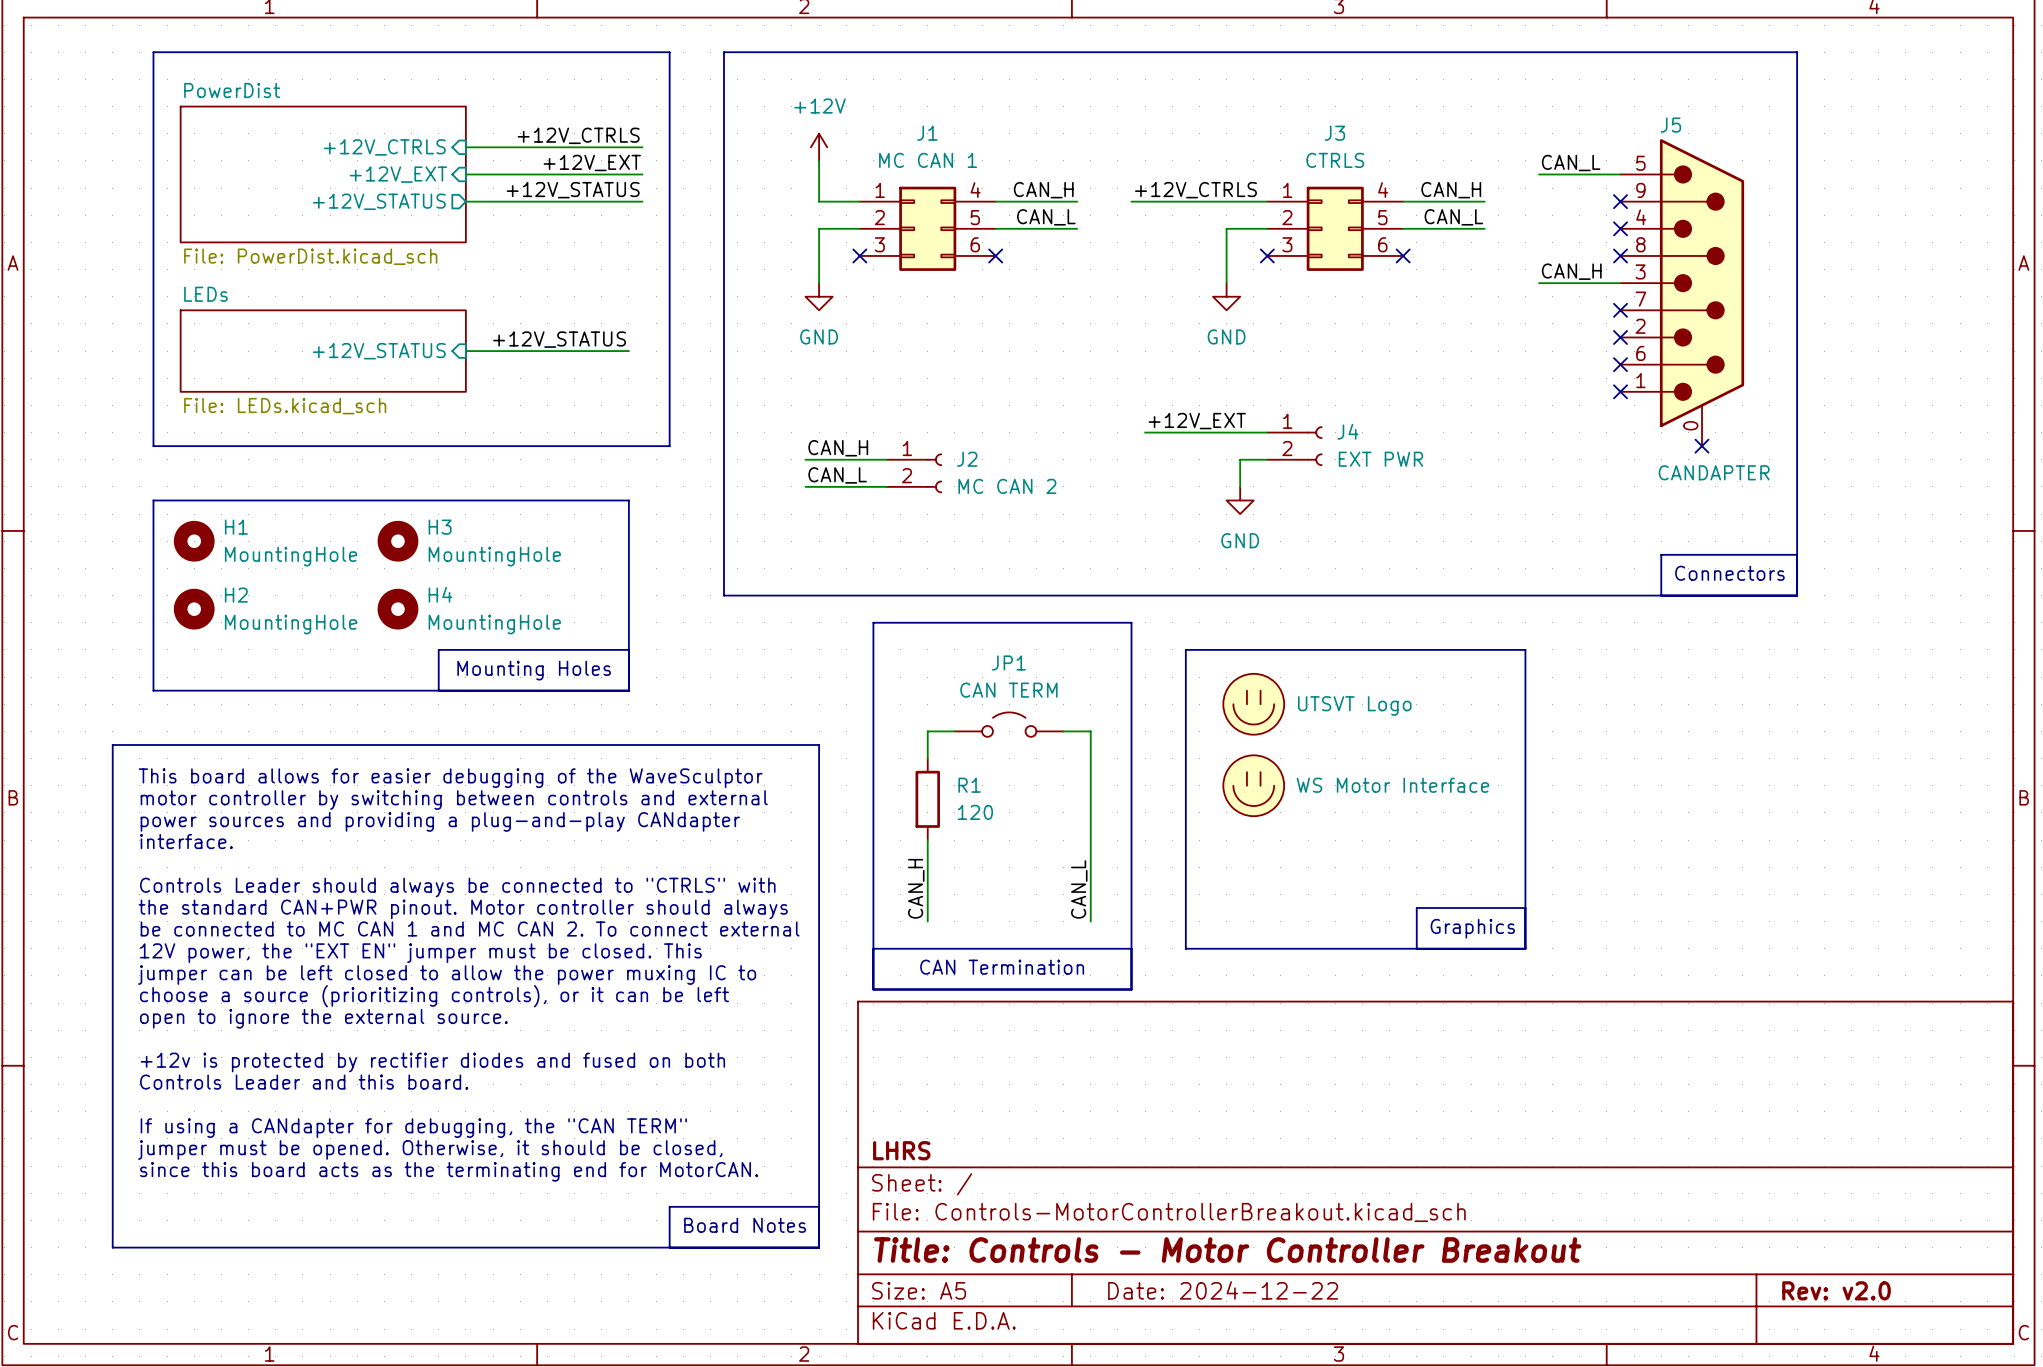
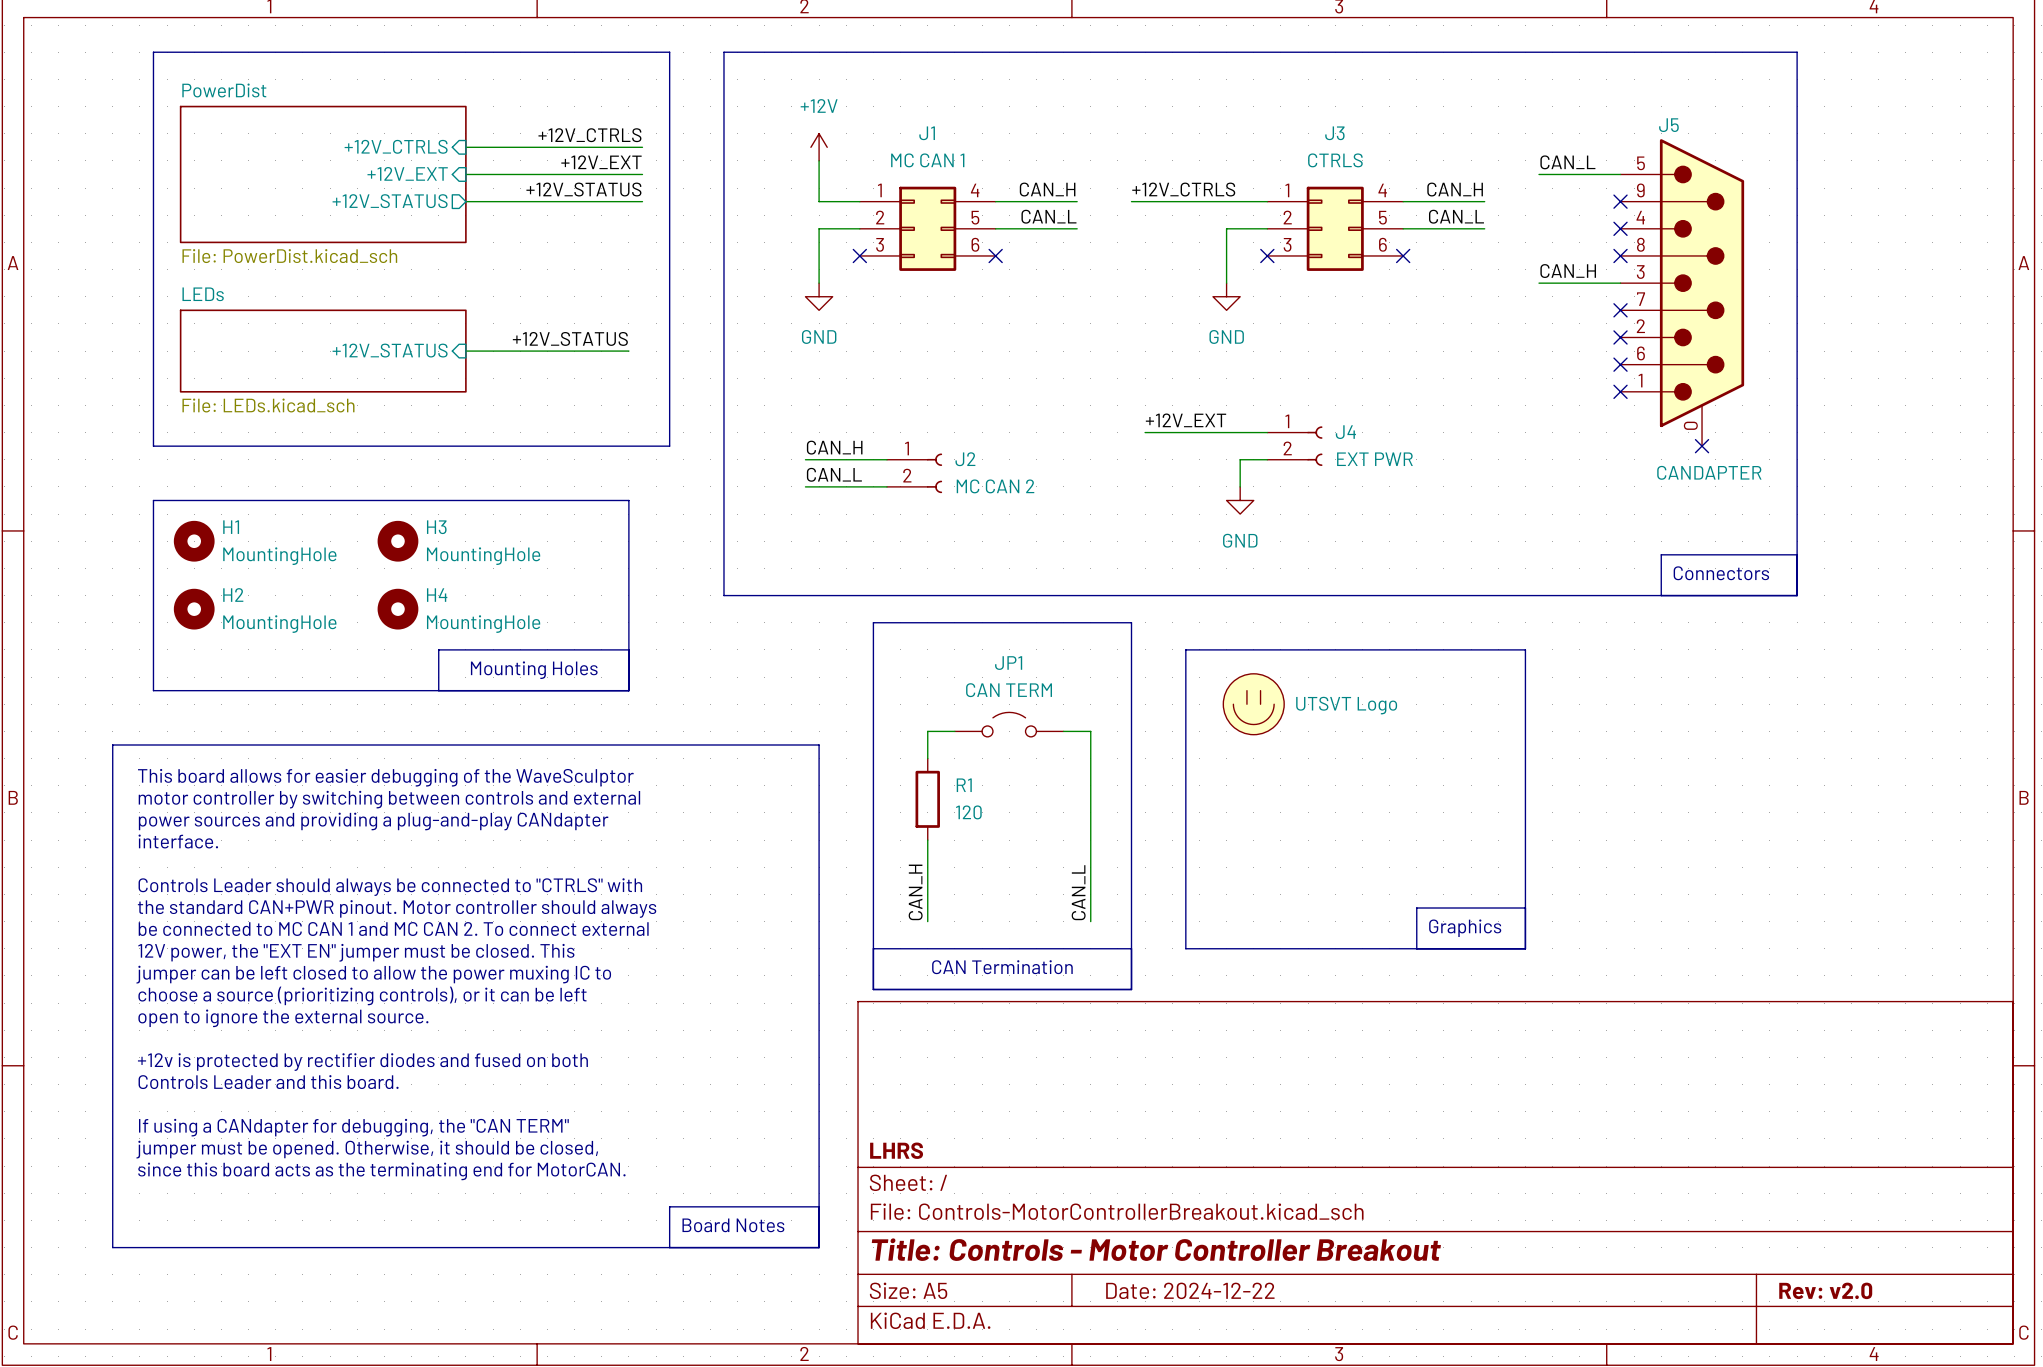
part: WS Motor Interface (1253, 785) -> none

